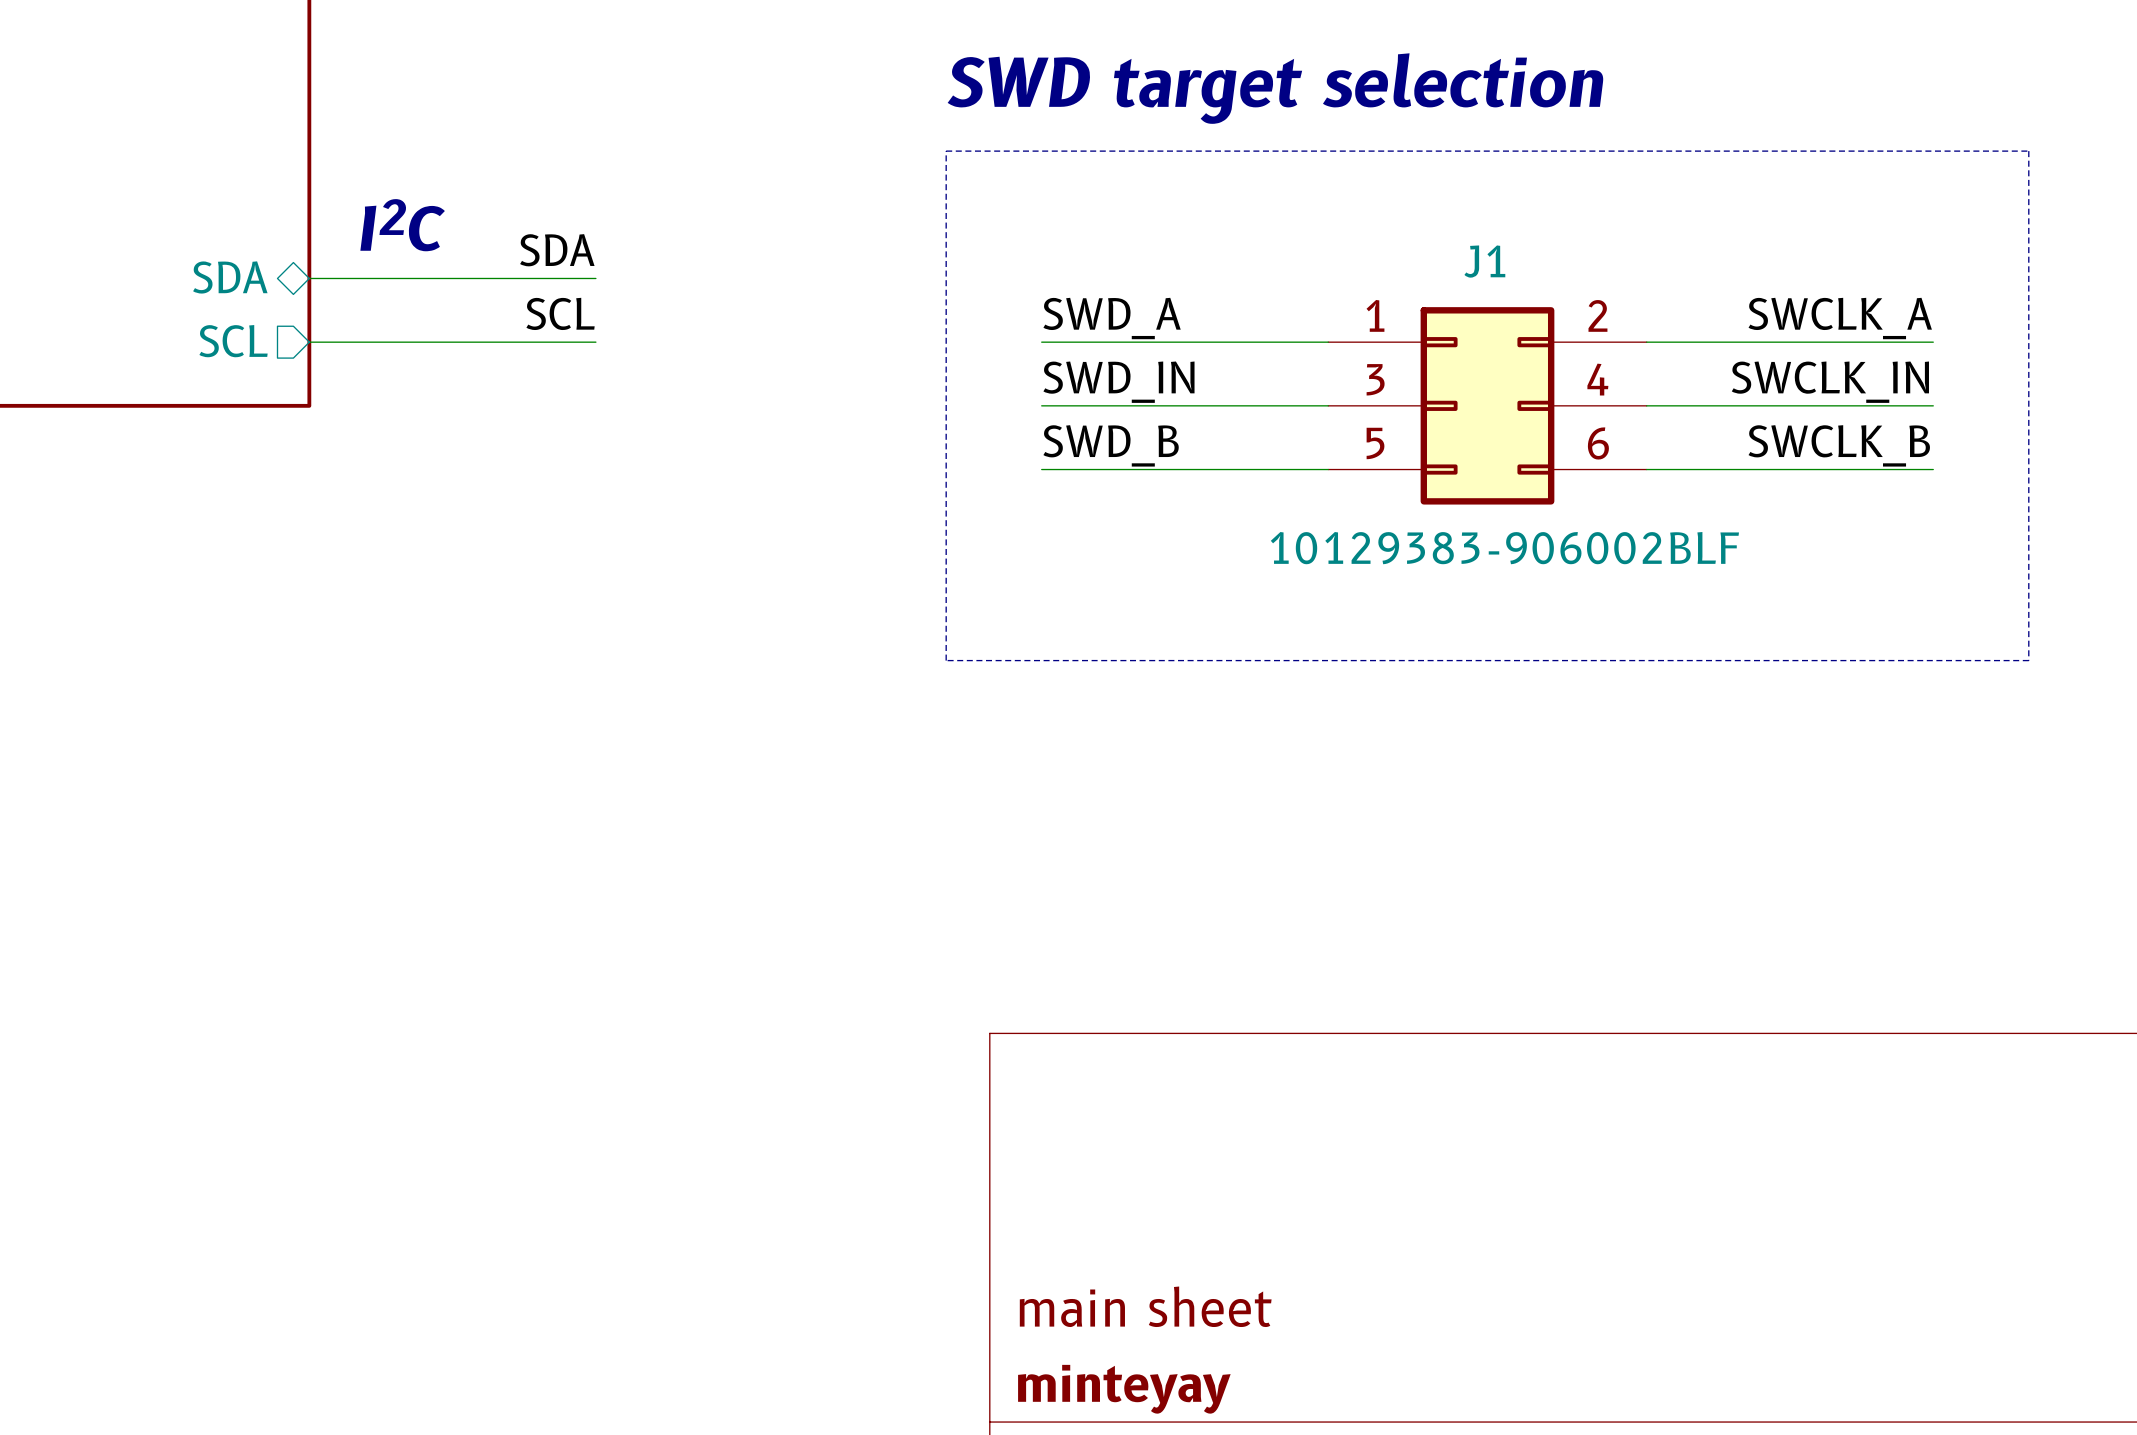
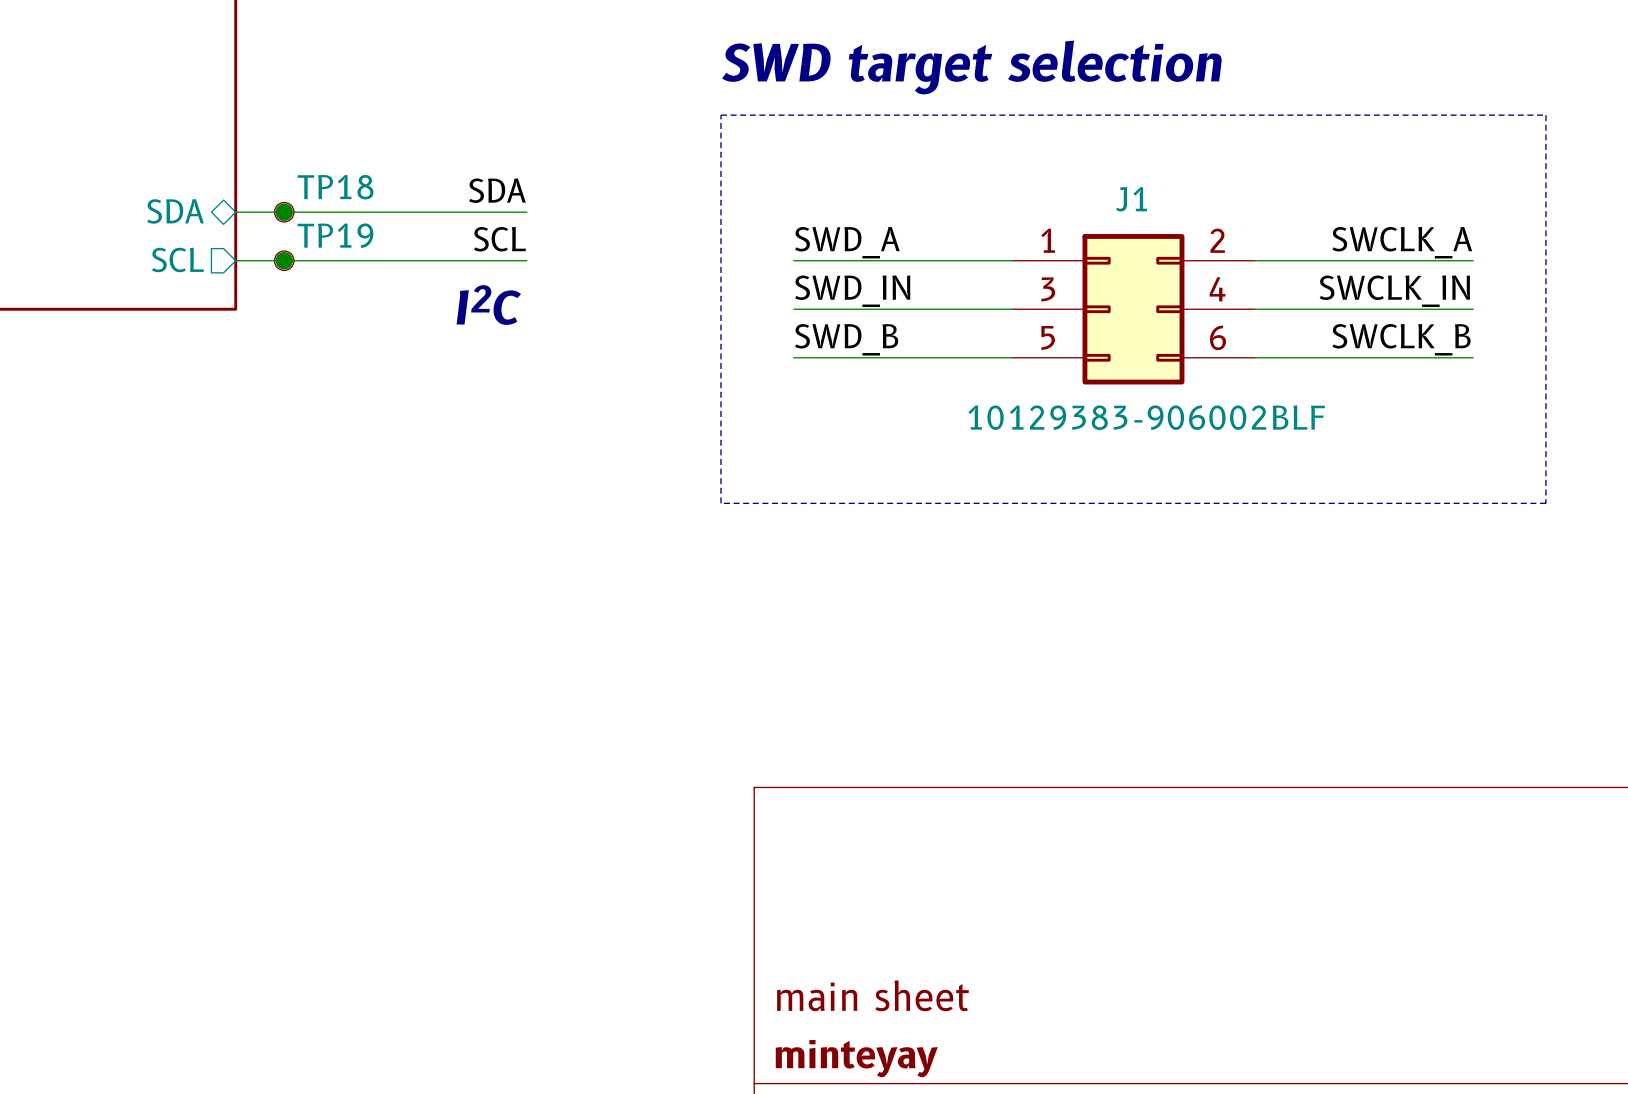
text position: I2C (402, 225) -> I2C (488, 305)
label position: SDA (557, 250) -> SDA (497, 190)
junction: none -> (284, 212)
TP18: none -> (284, 212)
wire: none -> (454, 212) (526, 212)
label position: SCL (560, 313) -> SCL (499, 239)
junction: none -> (284, 260)
TP19: none -> (284, 260)
wire: none -> (454, 260) (526, 260)

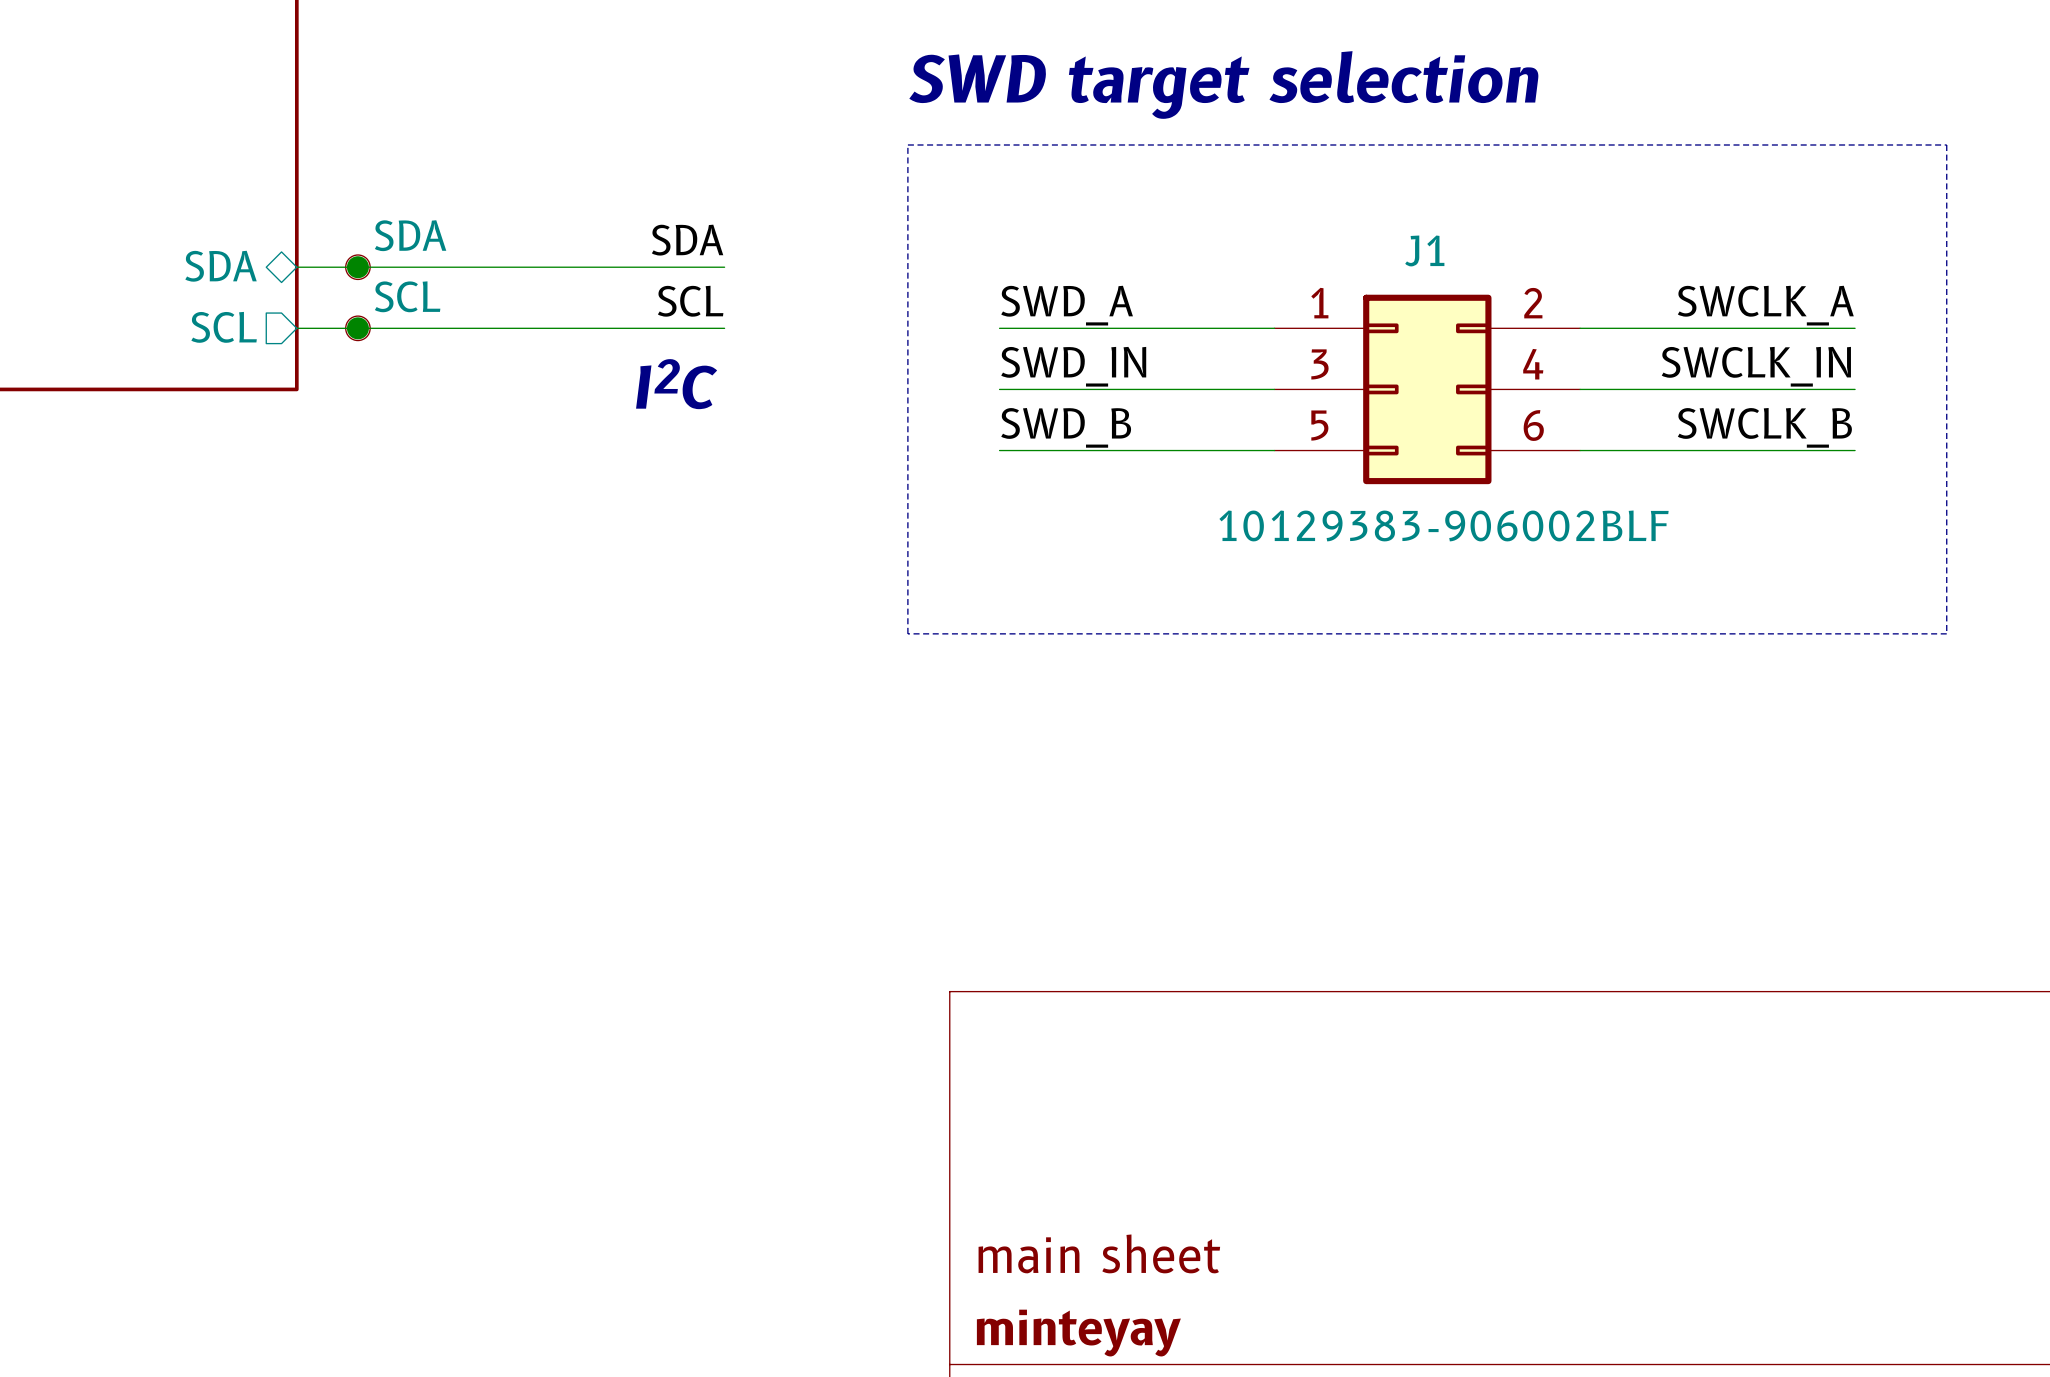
TP18 value: none -> SDA (410, 235)
TP18 name: TP18 (335, 187) -> none
label position: SDA (497, 190) -> SDA (687, 240)
wire: none -> (663, 267) (724, 267)
TP19 value: none -> SCL (407, 296)
TP19 name: TP19 (335, 235) -> none
label position: SCL (499, 239) -> SCL (690, 301)
wire: none -> (663, 328) (724, 328)
text position: I2C (488, 305) -> I2C (676, 384)

